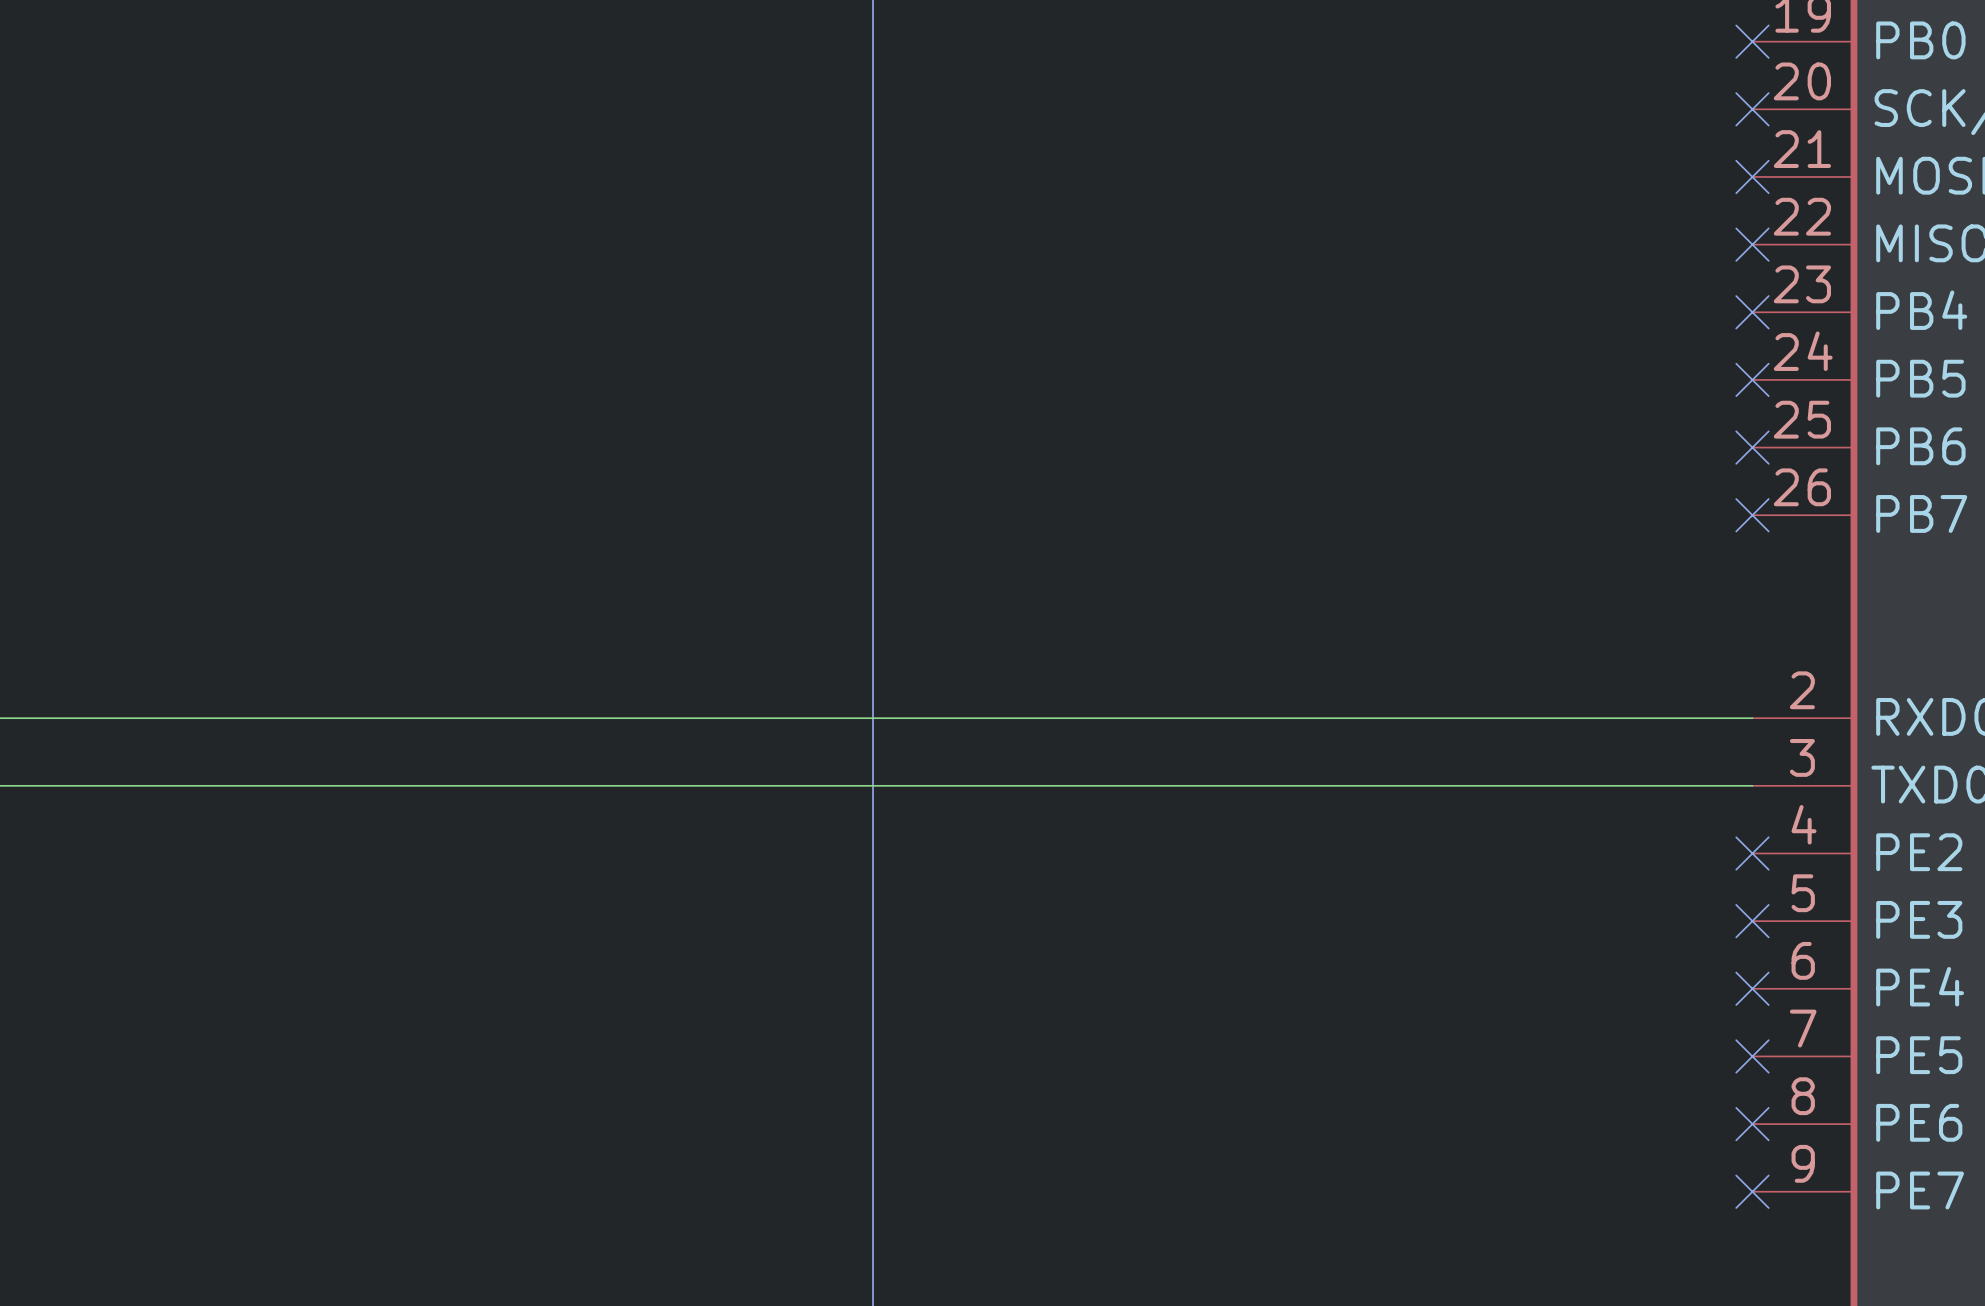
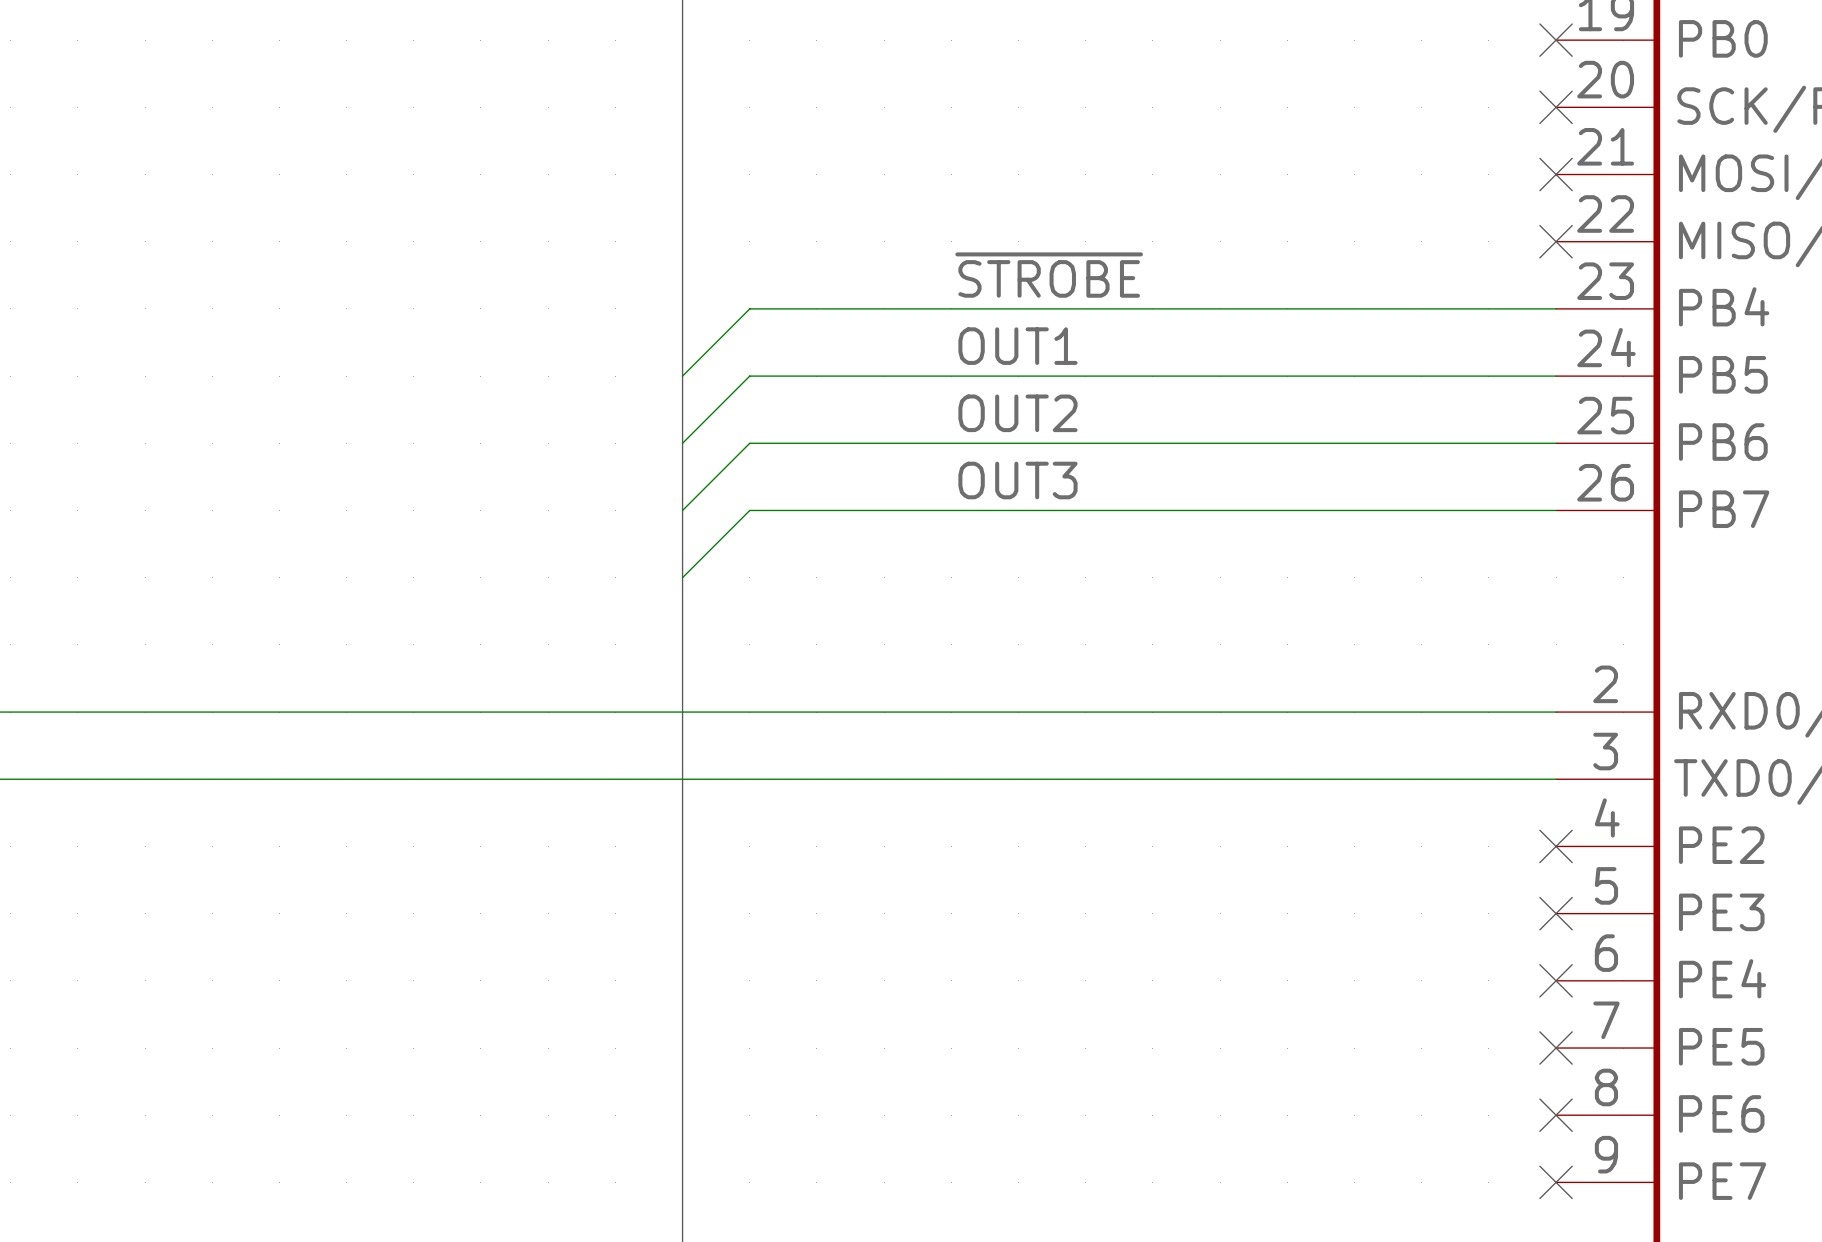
label: none -> ~{STROBE} (1049, 275)
wire: none -> (1556, 308) (749, 308) (682, 376)
no-connect mark: (1752, 312) -> none
label: none -> OUT1 (1017, 346)
wire: none -> (1556, 376) (749, 376) (682, 443)
no-connect mark: (1752, 379) -> none
label: none -> OUT2 (1017, 413)
wire: none -> (1556, 443) (749, 443) (682, 510)
no-connect mark: (1752, 447) -> none
label: none -> OUT3 (1017, 480)
wire: none -> (1556, 510) (749, 510) (682, 577)
no-connect mark: (1752, 515) -> none

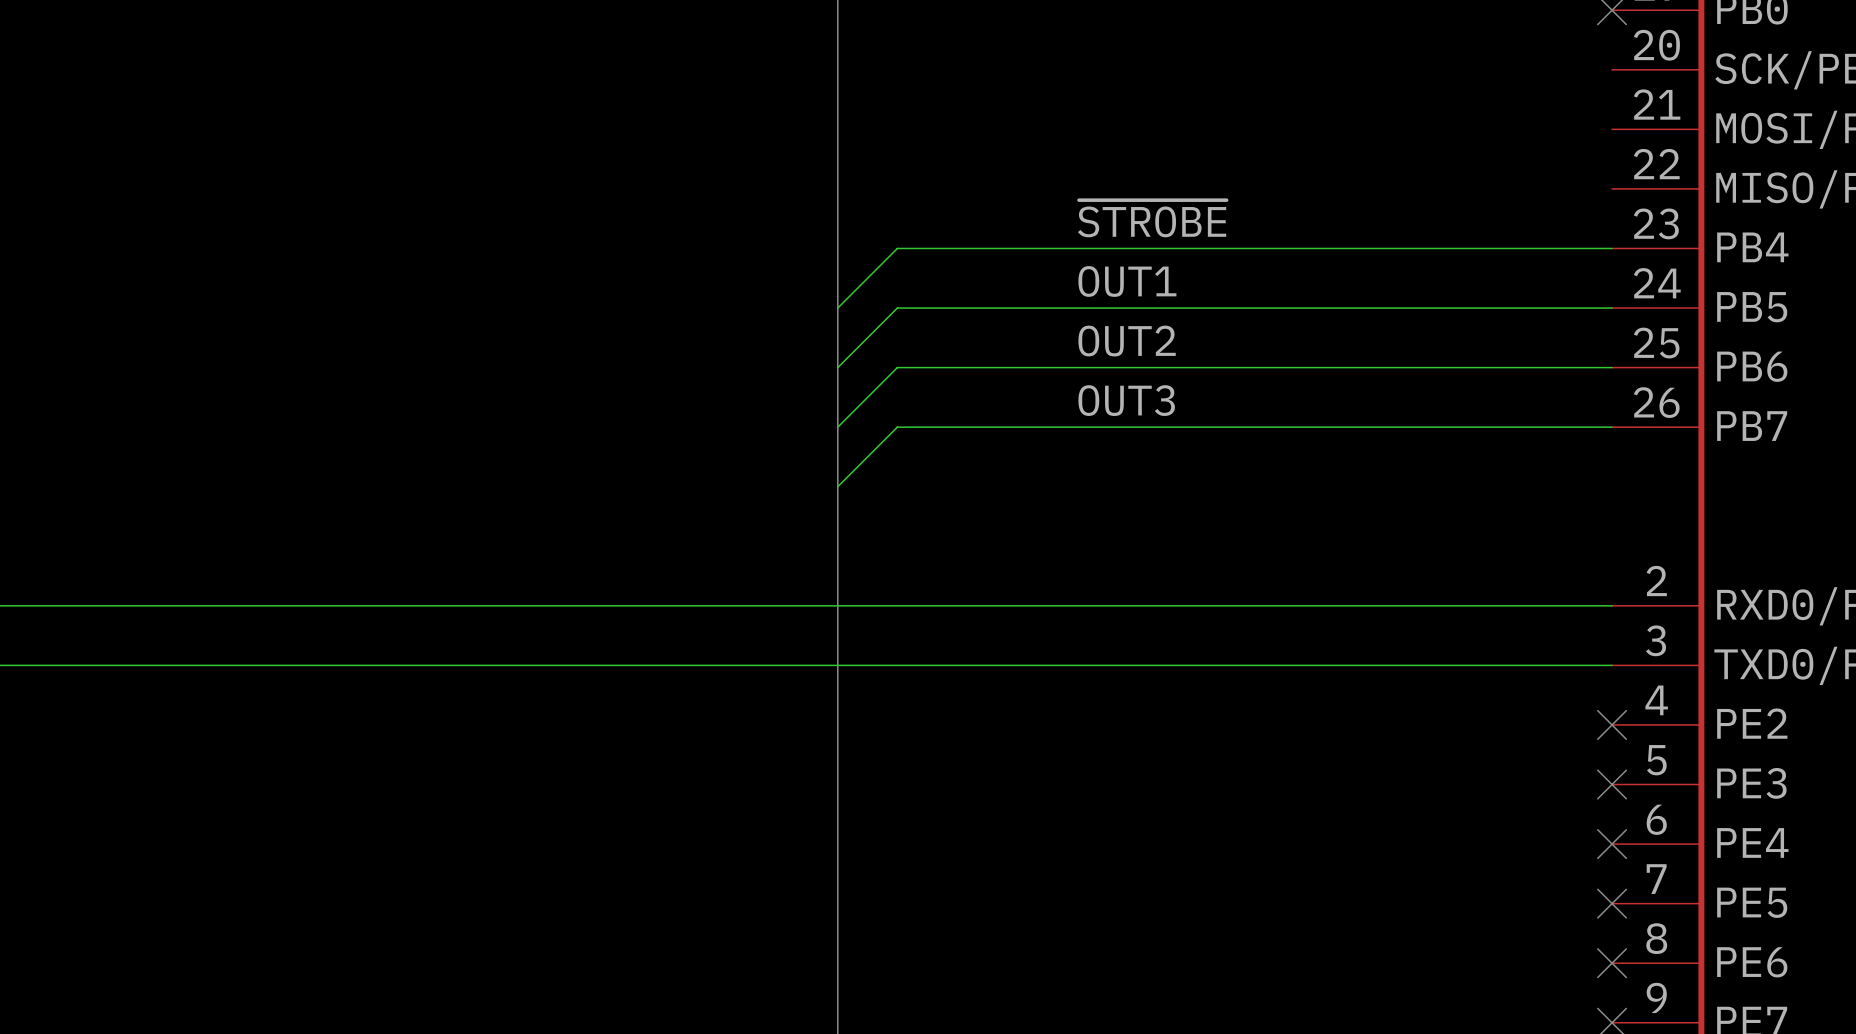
no-connect mark: (1556, 107) -> none
no-connect mark: (1556, 174) -> none
no-connect mark: (1556, 241) -> none

